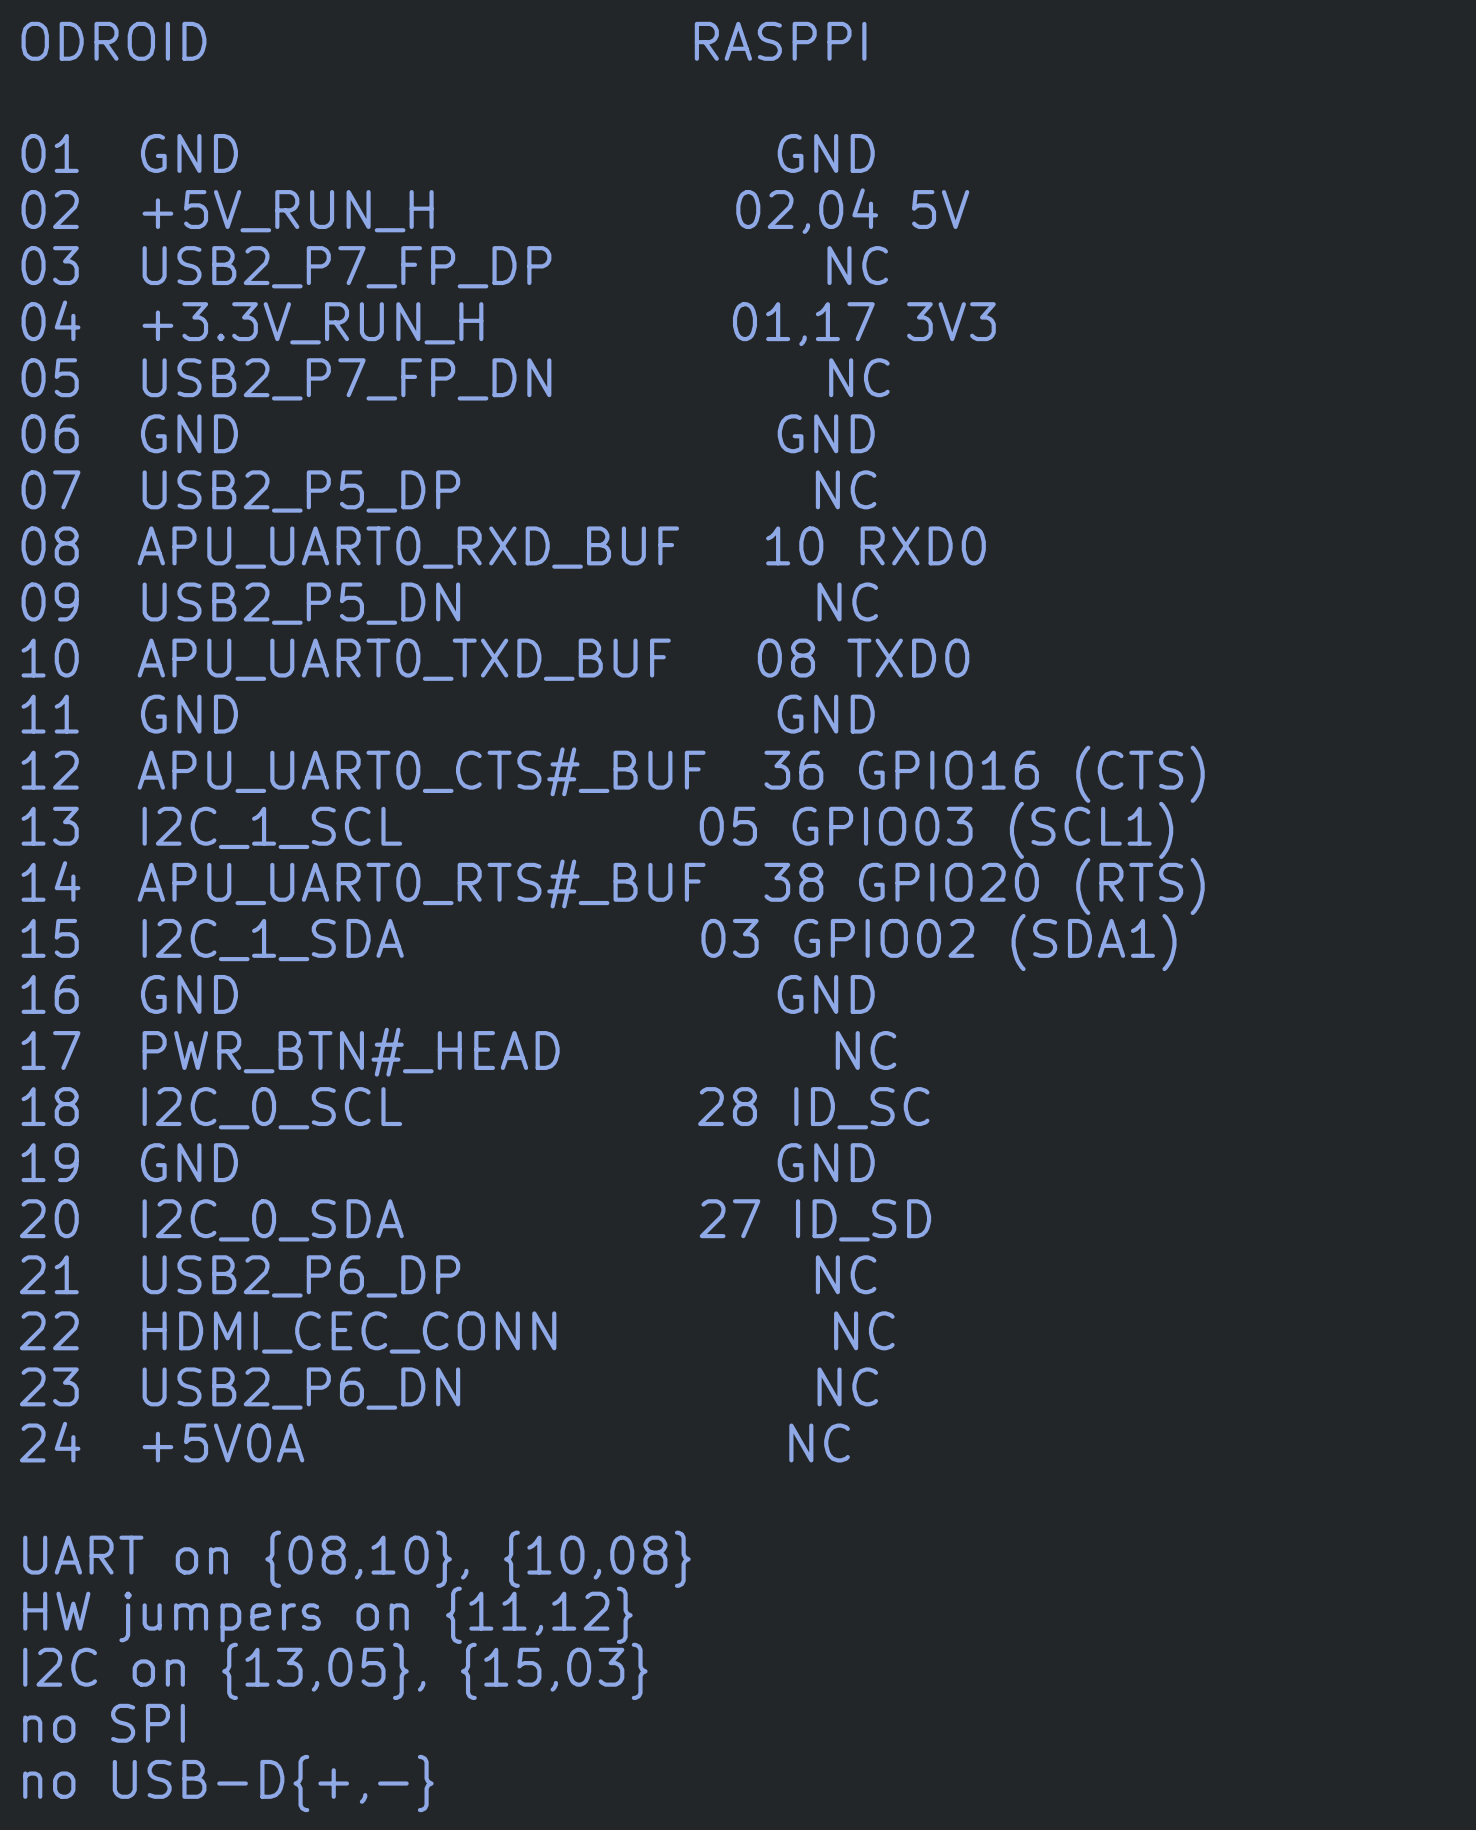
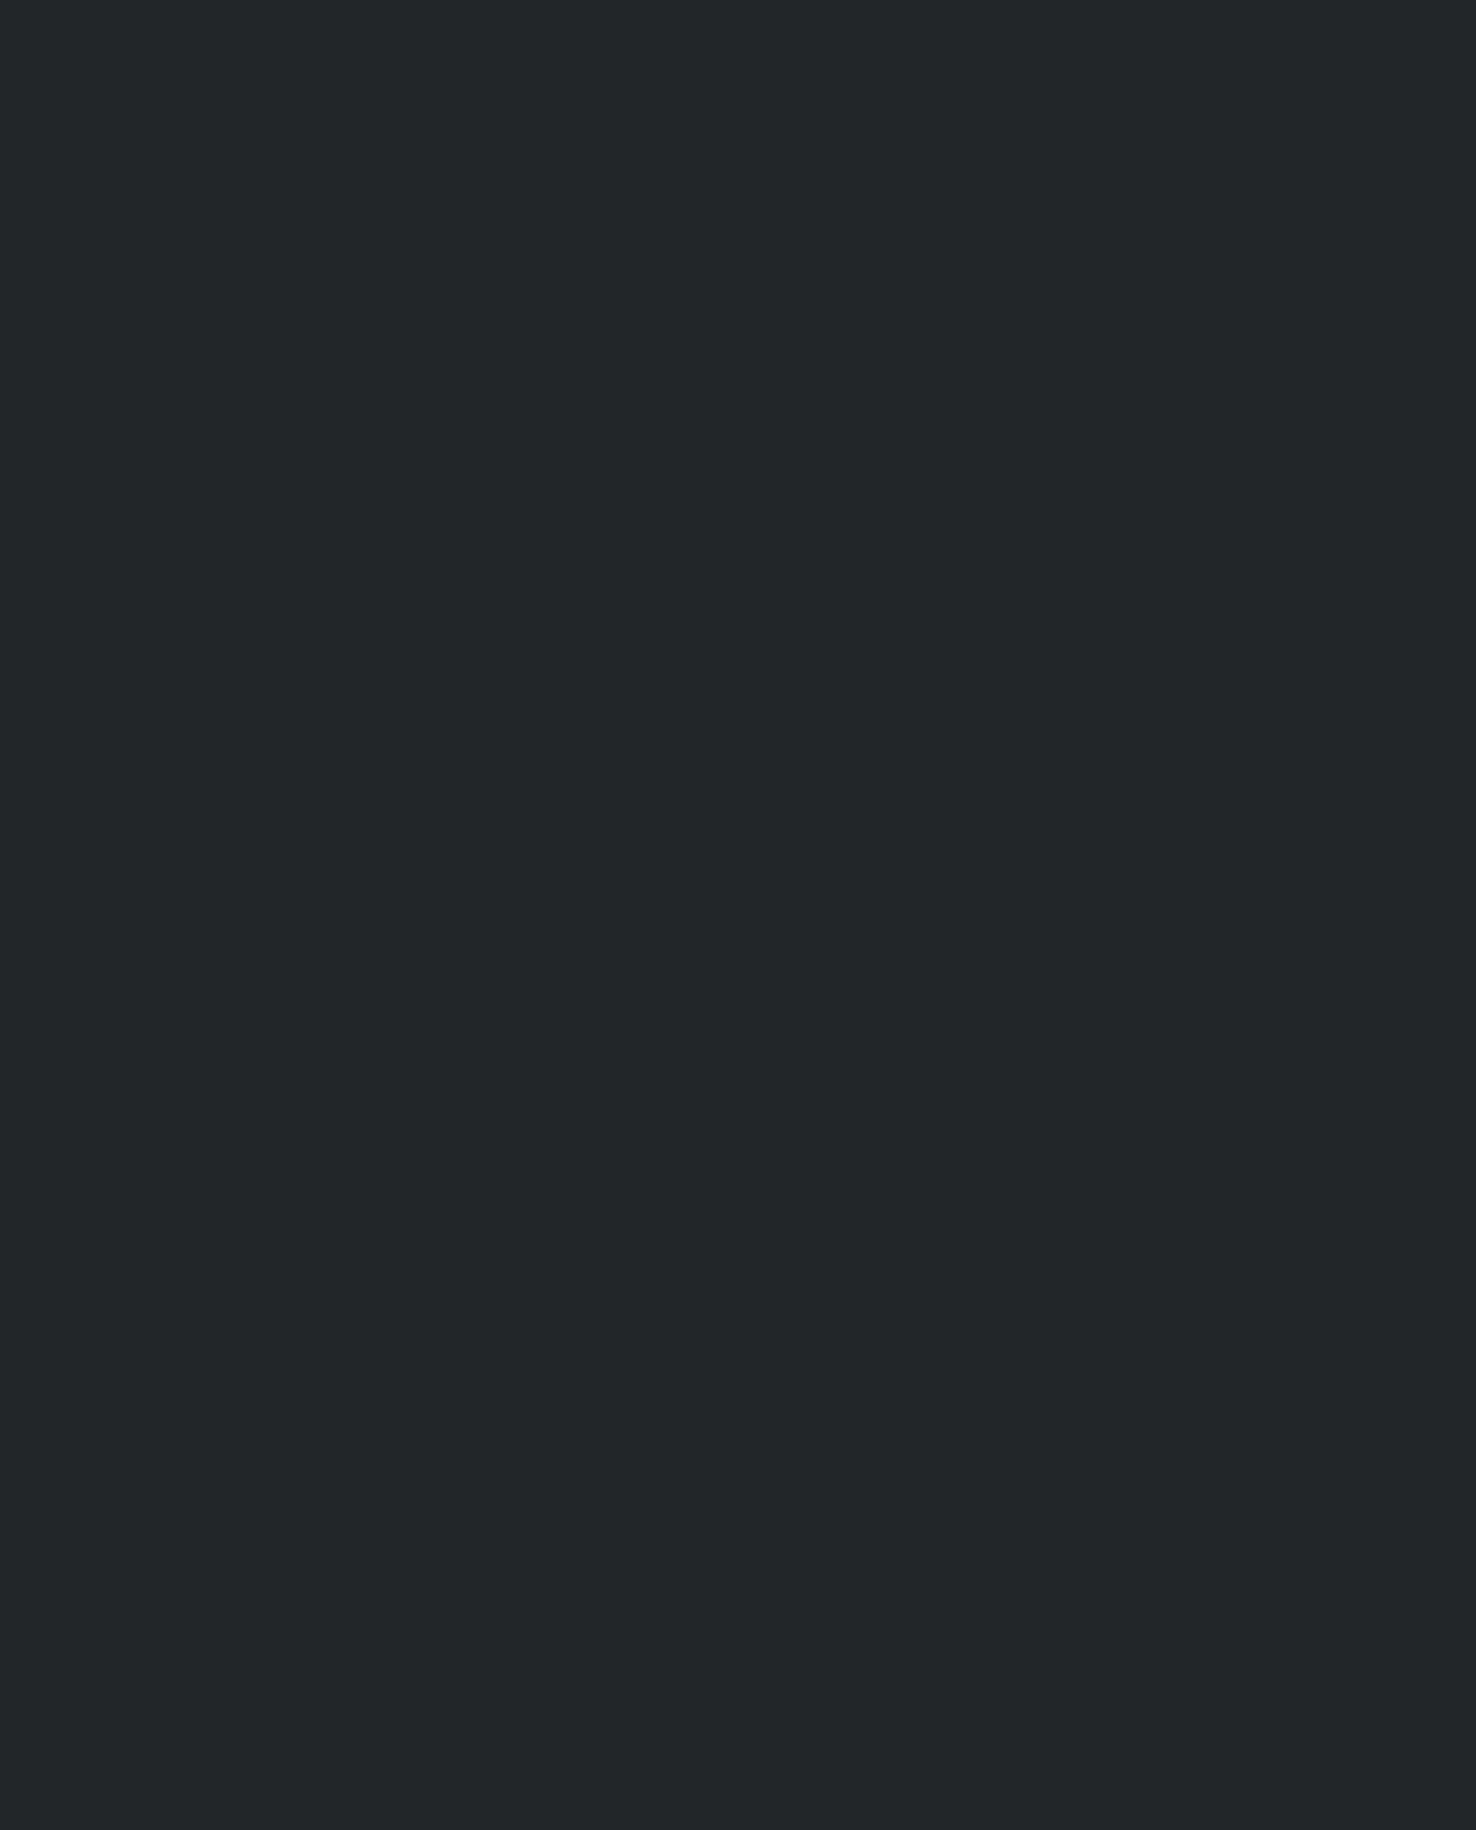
text: ODROID RASPPI (443, 41) -> none
text: 01 GND GND (448, 153) -> none
text: 02 +5V_RUN_H 02,04 5V (495, 211) -> none
text: 03 USB2_P7_FP_DP NC (454, 267) -> none
text: 04 +3.3V_RUN_H 01,17 3V3 (508, 323) -> none
text: 05 USB2_P7_FP_DN NC (455, 379) -> none
text: 06 GND GND (448, 433) -> none
text: 07 USB2_P5_DP NC (448, 491) -> none
text: 08 APU_UART0_RXD_BUF 10 RXD0 (503, 547) -> none
text: 09 USB2_P5_DN NC (449, 603) -> none
text: 10 APU_UART0_TXD_BUF 08 TXD0 (495, 659) -> none
text: 11 GND GND (448, 714) -> none
text: 12 APU_UART0_CTS#_BUF 36 GPIO16 (CTS) (613, 774) -> none
text: 13 I2C_1_SCL 05 GPIO03 (SCL1) (597, 830) -> none
text: 14 APU_UART0_RTS#_BUF 38 GPIO20 (RTS) (613, 886) -> none
text: 15 I2C_1_SDA 03 GPIO02 (SDA1) (599, 942) -> none
text: 16 GND GND (448, 994) -> none
text: 17 PWR_BTN#_HEAD NC (458, 1052) -> none
text: 18 I2C_0_SCL 28 ID_SC (475, 1108) -> none
text: 19 GND GND (448, 1162) -> none
text: 20 I2C_0_SDA 27 ID_SD (475, 1220) -> none
text: 21 USB2_P6_DP NC (448, 1276) -> none
text: 22 HDMI_CEC_CONN NC (457, 1332) -> none
text: 23 USB2_P6_DN NC (448, 1388) -> none
text: 24 +5V0A NC (434, 1442) -> none
text: UART on {08,10}, {10,08} (356, 1559) -> none
text: HW jumpers on {11,12} (327, 1615) -> none
text: I2C on {13,05}, {15,03} (335, 1671) -> none
text: no SPI (104, 1723) -> none
text: no USB-D{+,-} (228, 1783) -> none

